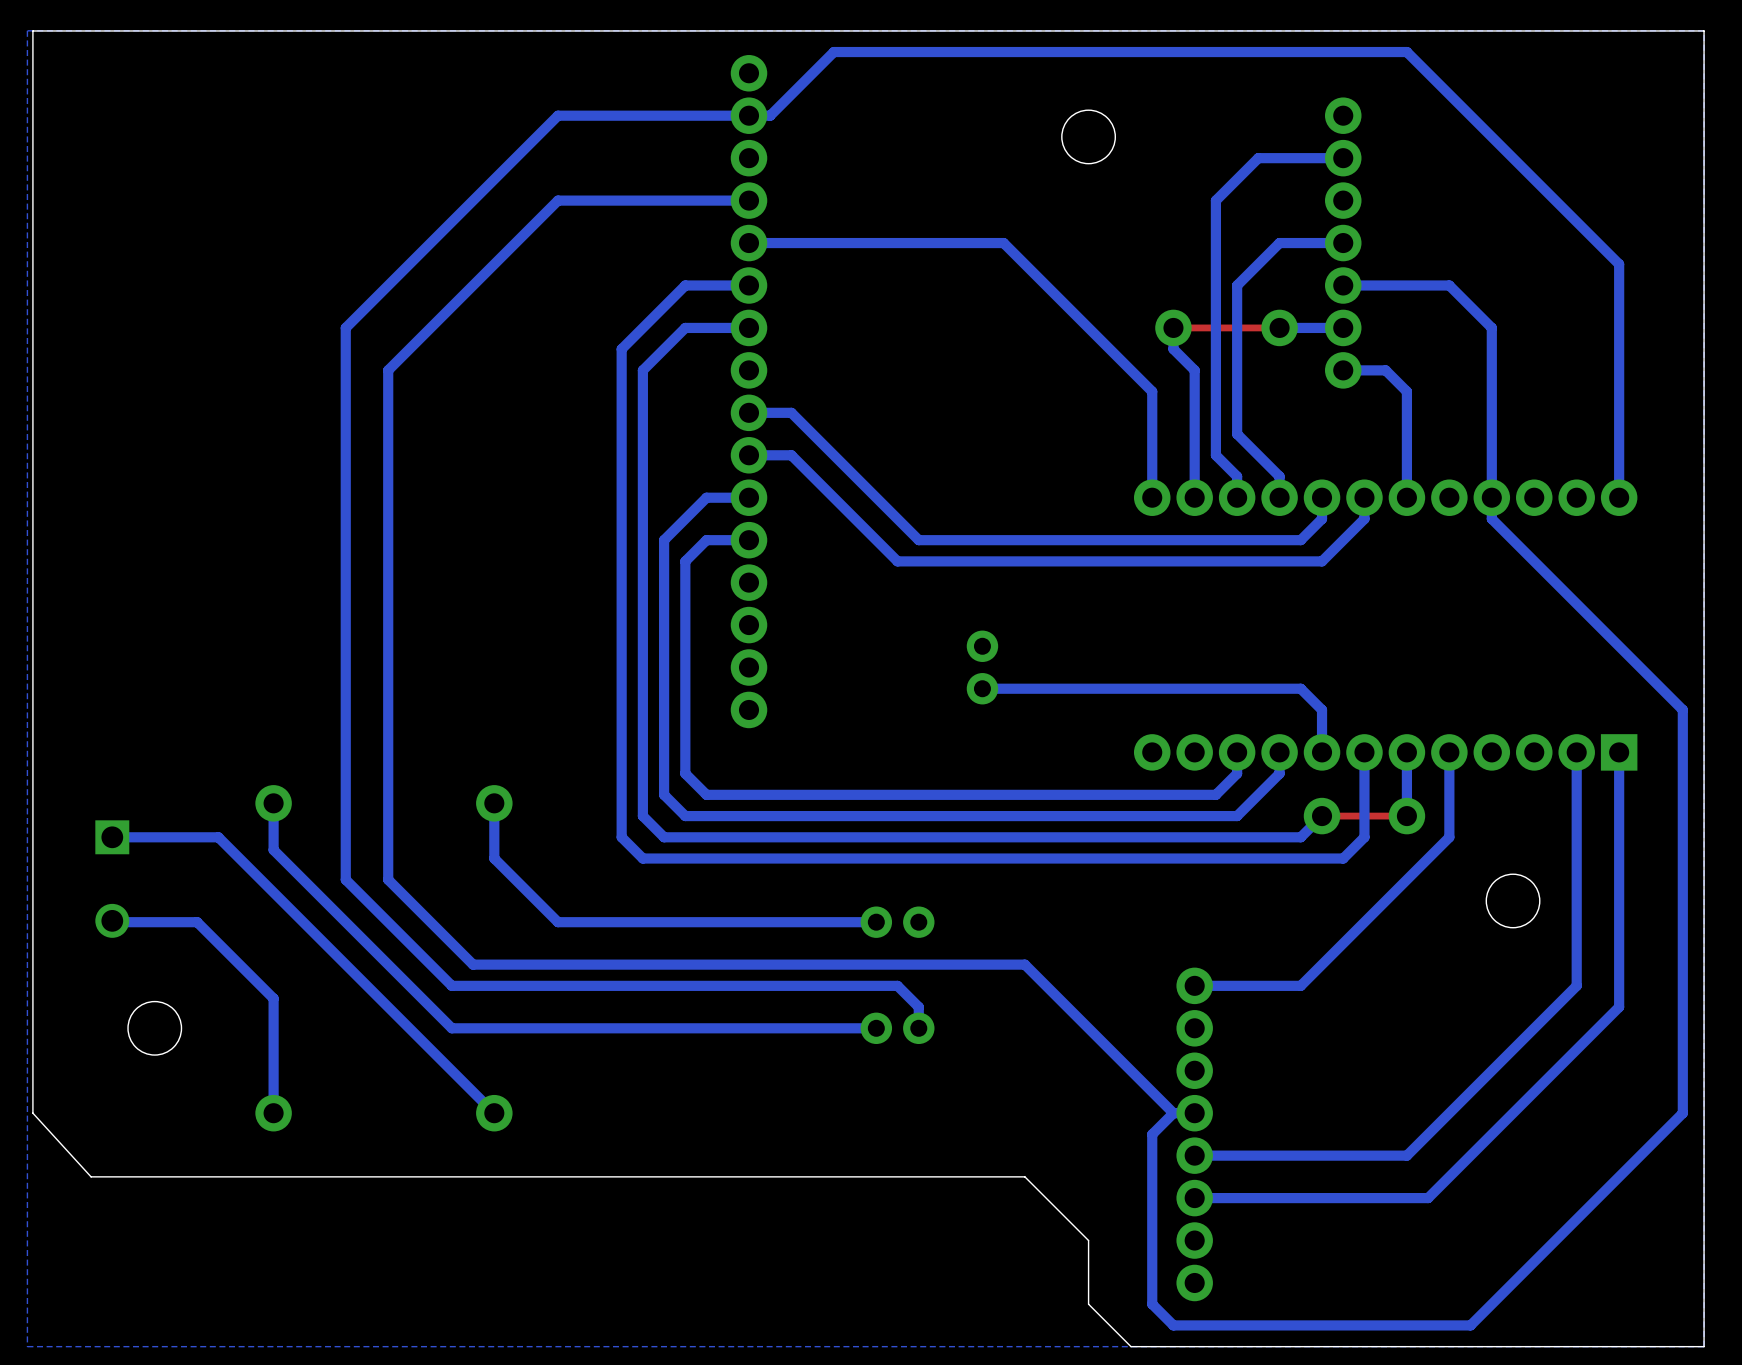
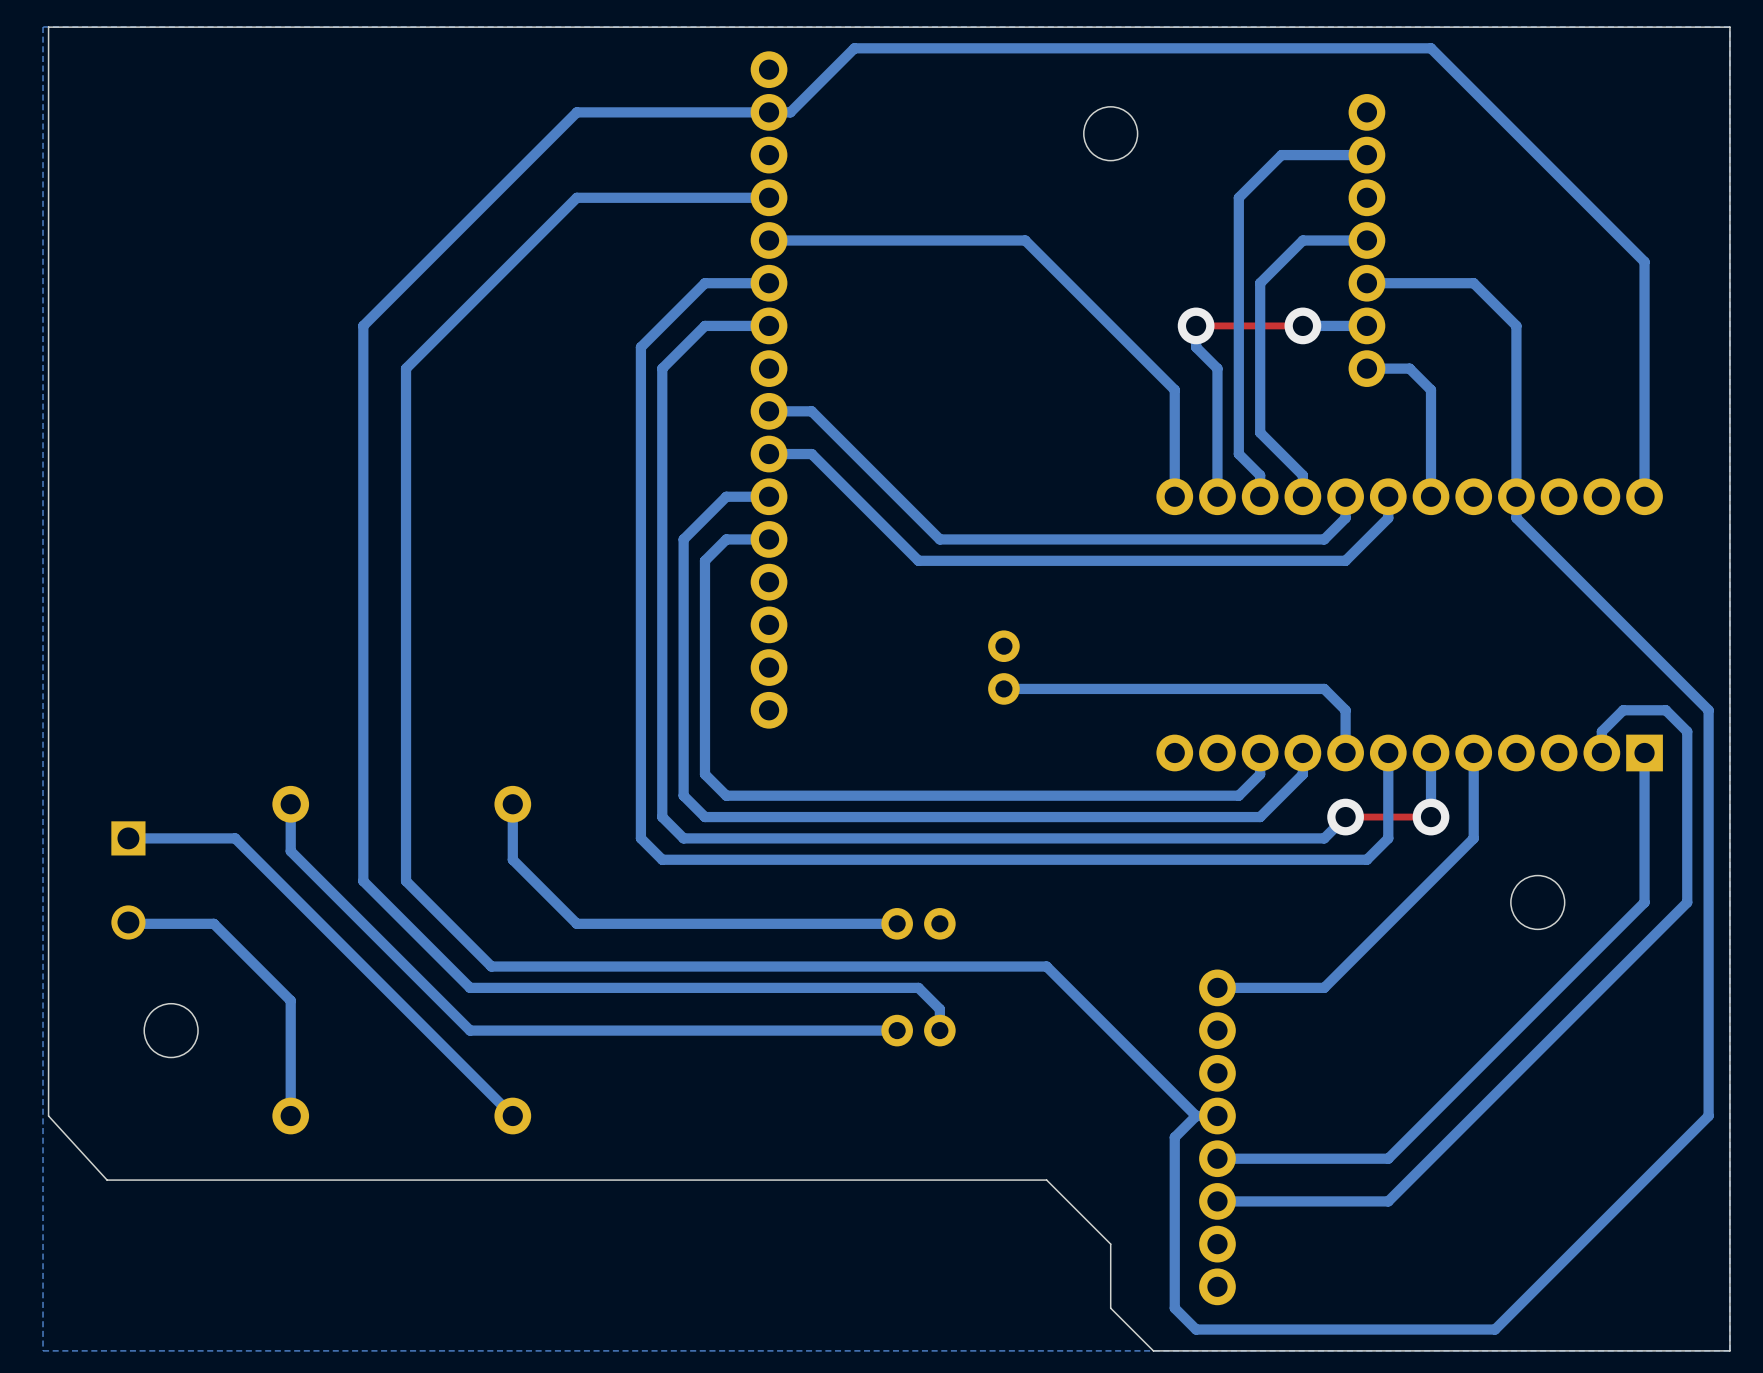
bottom track: (1576, 752) (1576, 985) -> (1601, 752) (1601, 731) (1623, 710) (1665, 710) (1687, 731) (1687, 902) (1601, 987)
bottom track: (1619, 900) (1619, 1007) (1428, 1198) (1364, 1198) -> (1644, 902) (1388, 1158)
bottom track: (1406, 1155) (1364, 1155) -> (1431, 1158) (1388, 1201)

